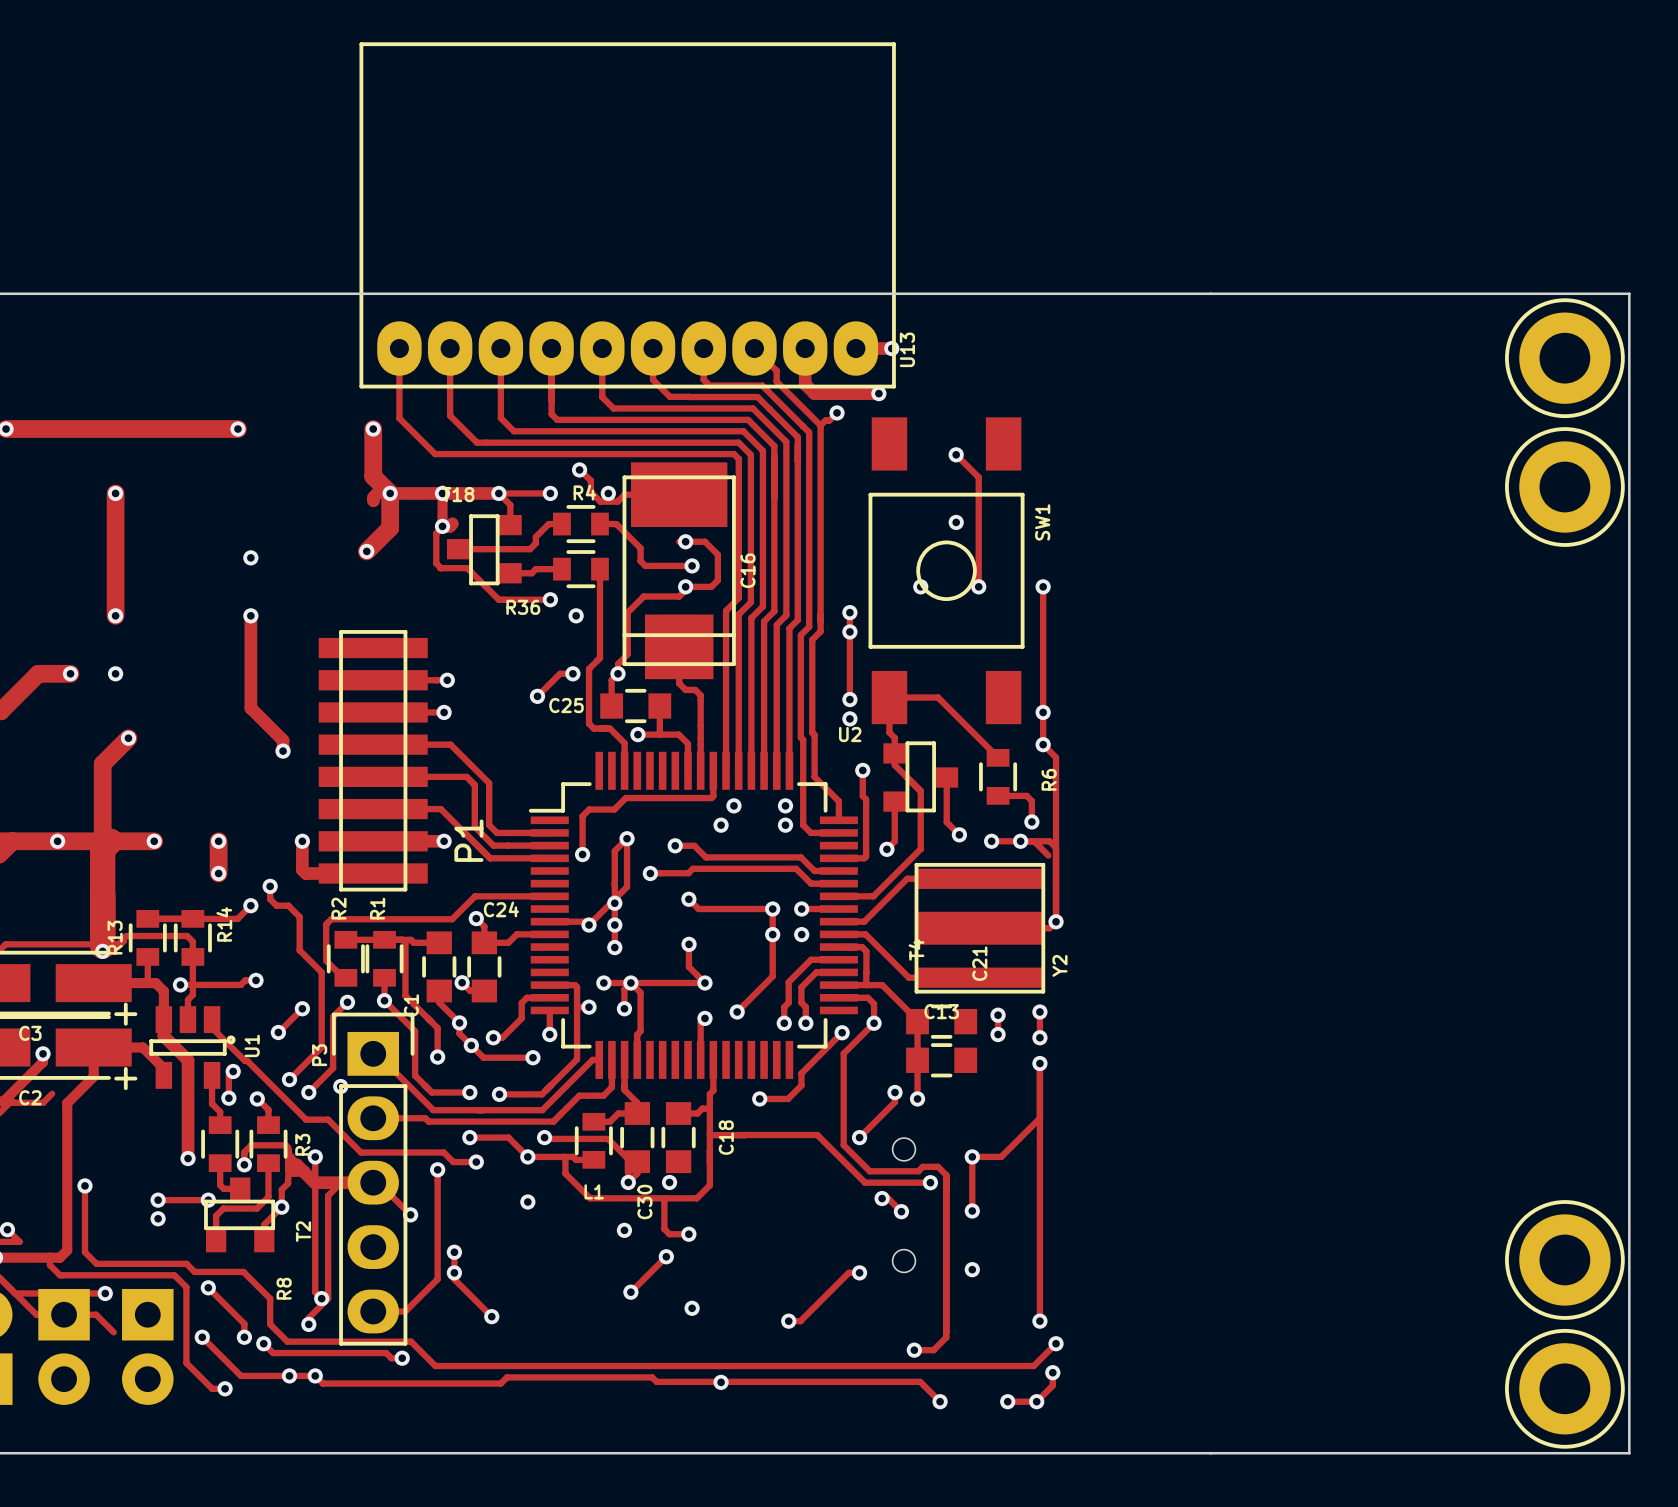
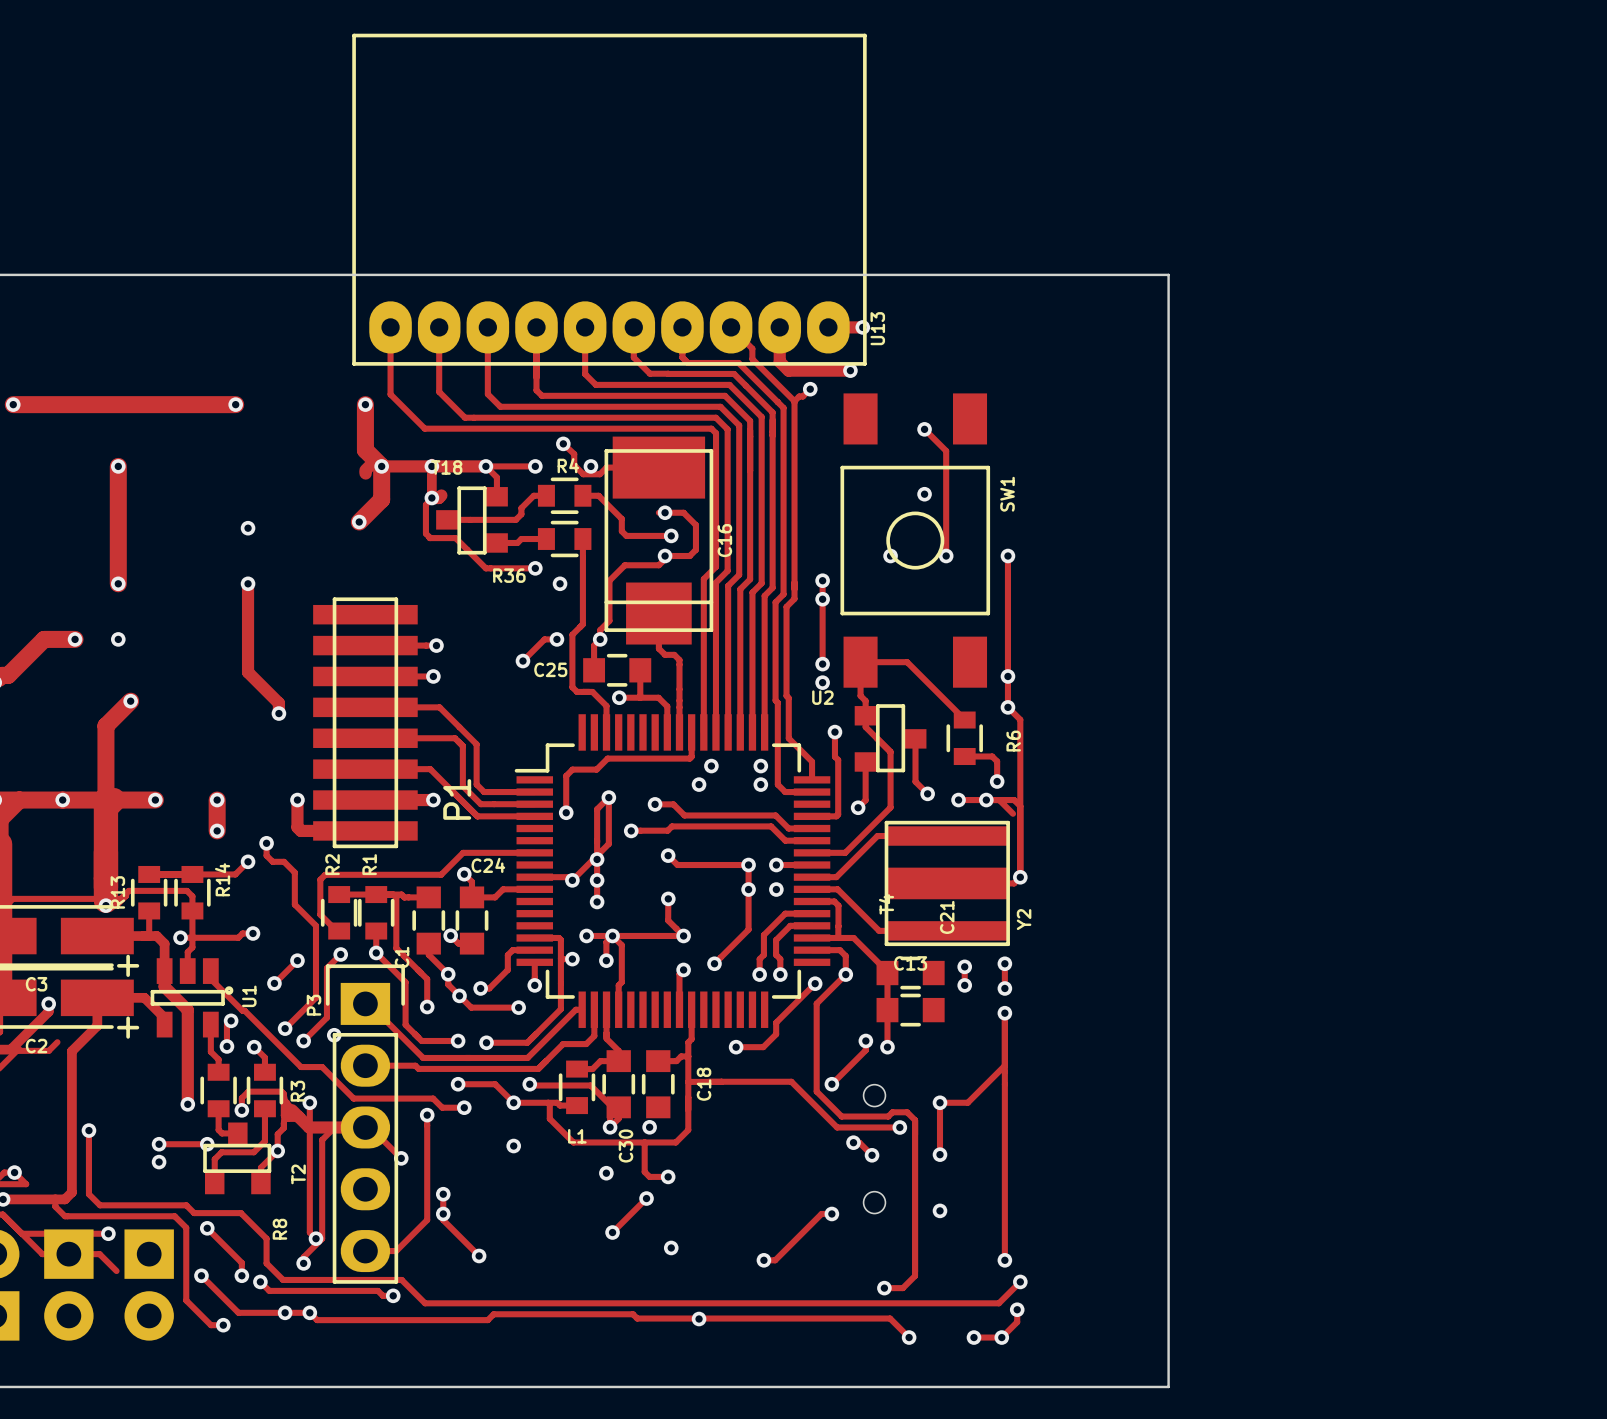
board edge: (1210, 293) (1629, 293) (1629, 1453) (1210, 1453) -> (1168, 274) (1168, 1386)
part: (1564, 358) -> none
part: (1564, 487) -> none
part: (1564, 1259) -> none
part: (1564, 1388) -> none

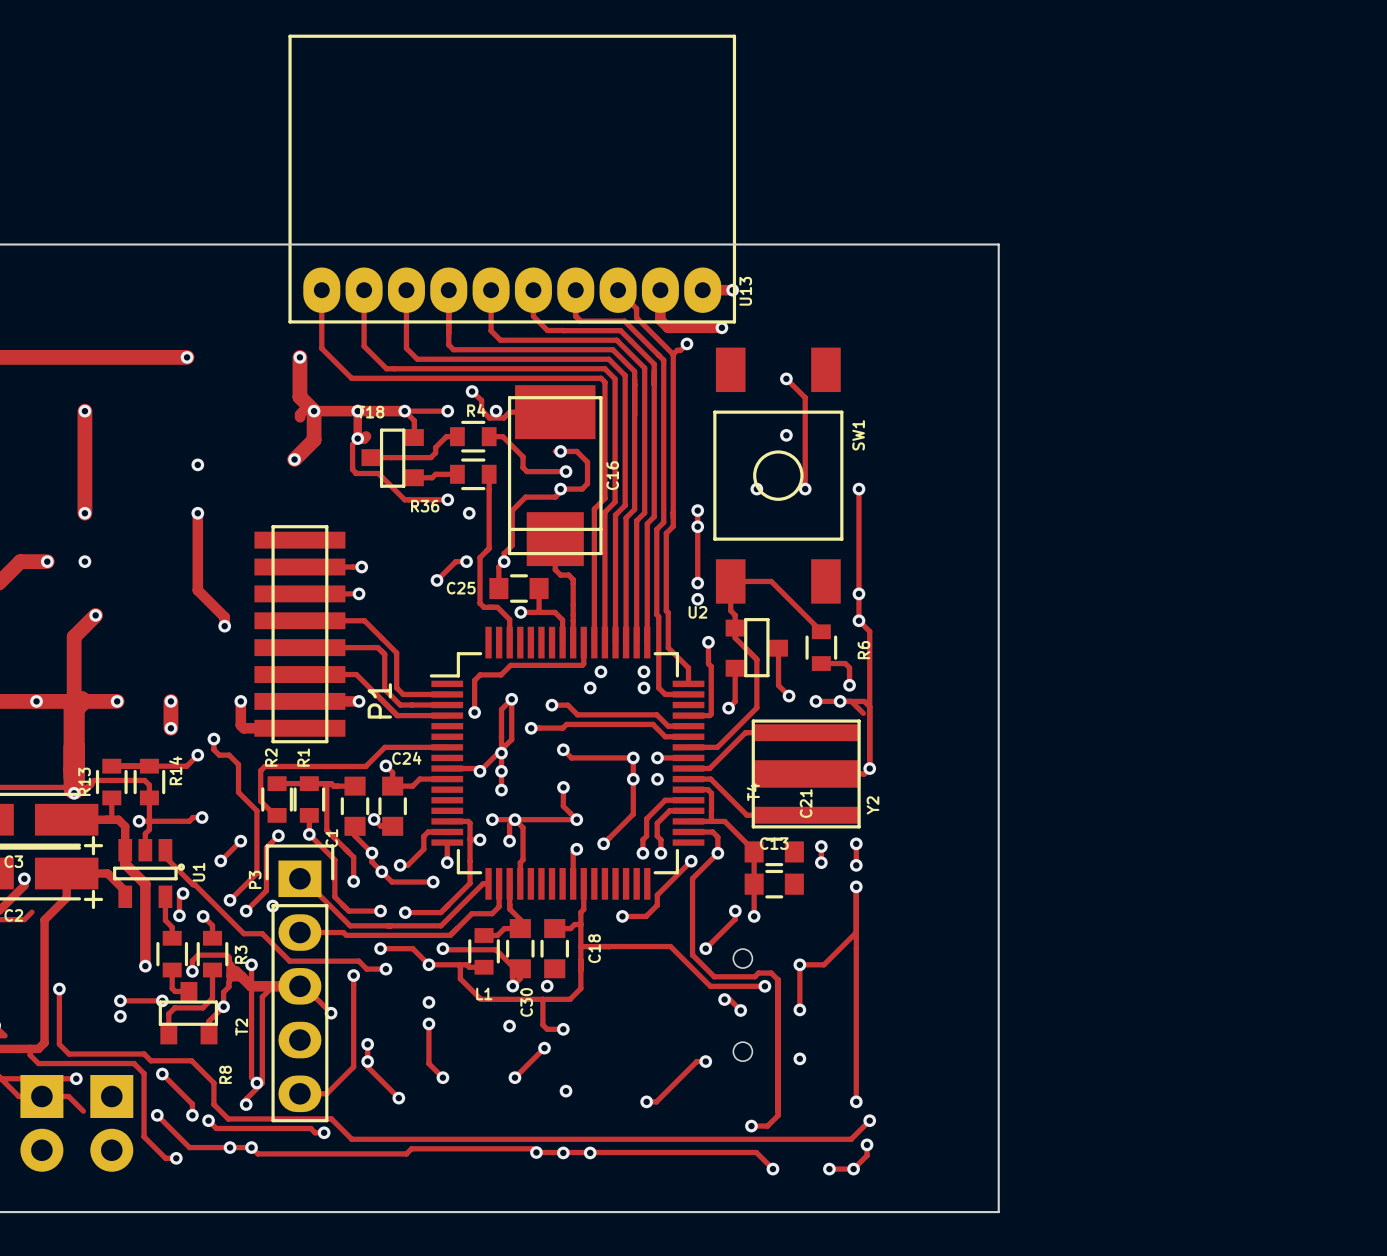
track: none -> (428, 1023) (428, 1063) (442, 1077)
via: none -> (428, 1023)
via: none -> (442, 1077)
via: none -> (536, 1152)
via: none -> (563, 1152)

